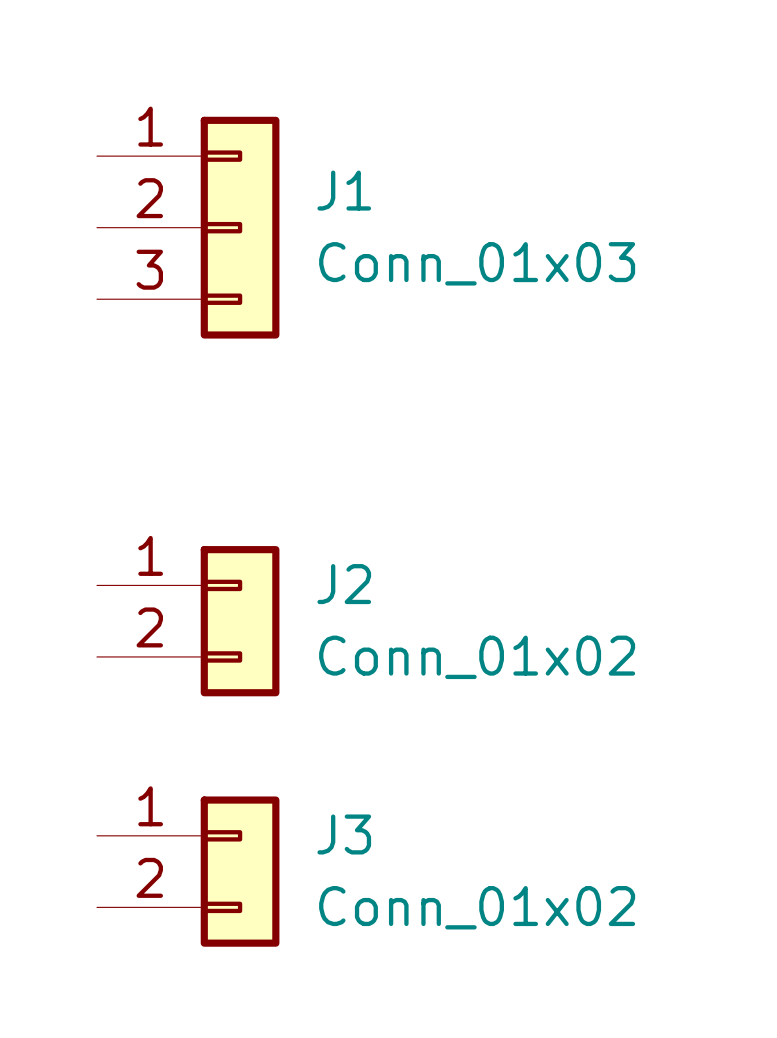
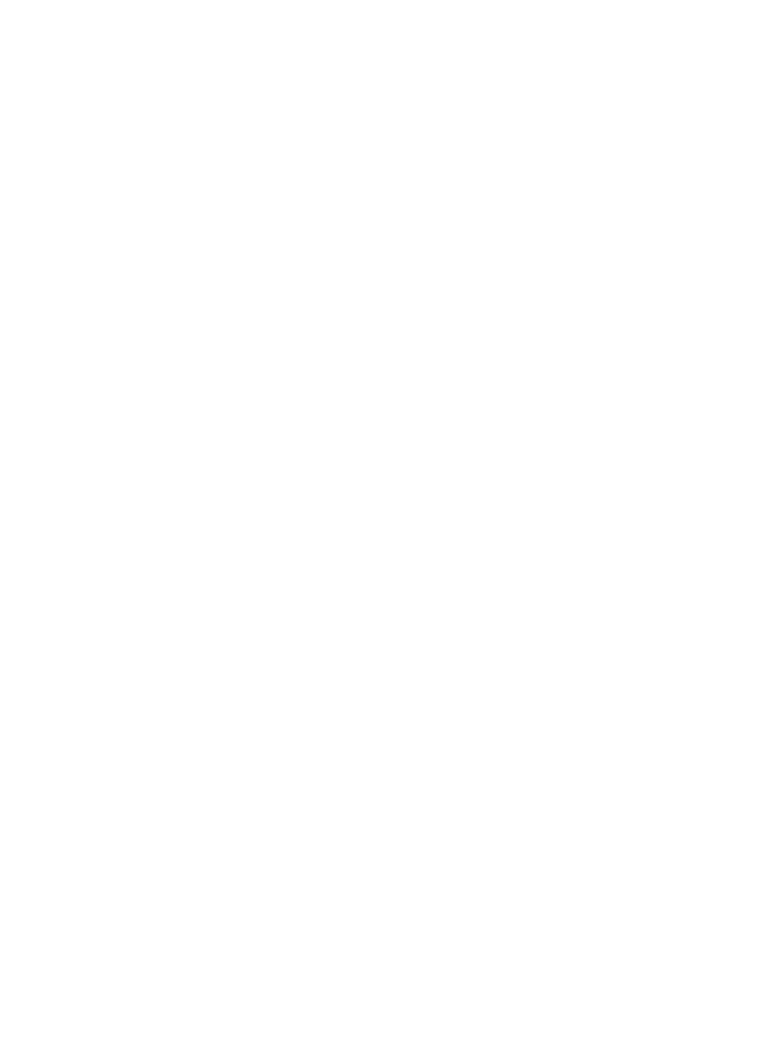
J1: Conn_01x03 (188, 227) -> none
J2: Conn_01x02 (188, 621) -> none
J3: Conn_01x02 (188, 871) -> none

